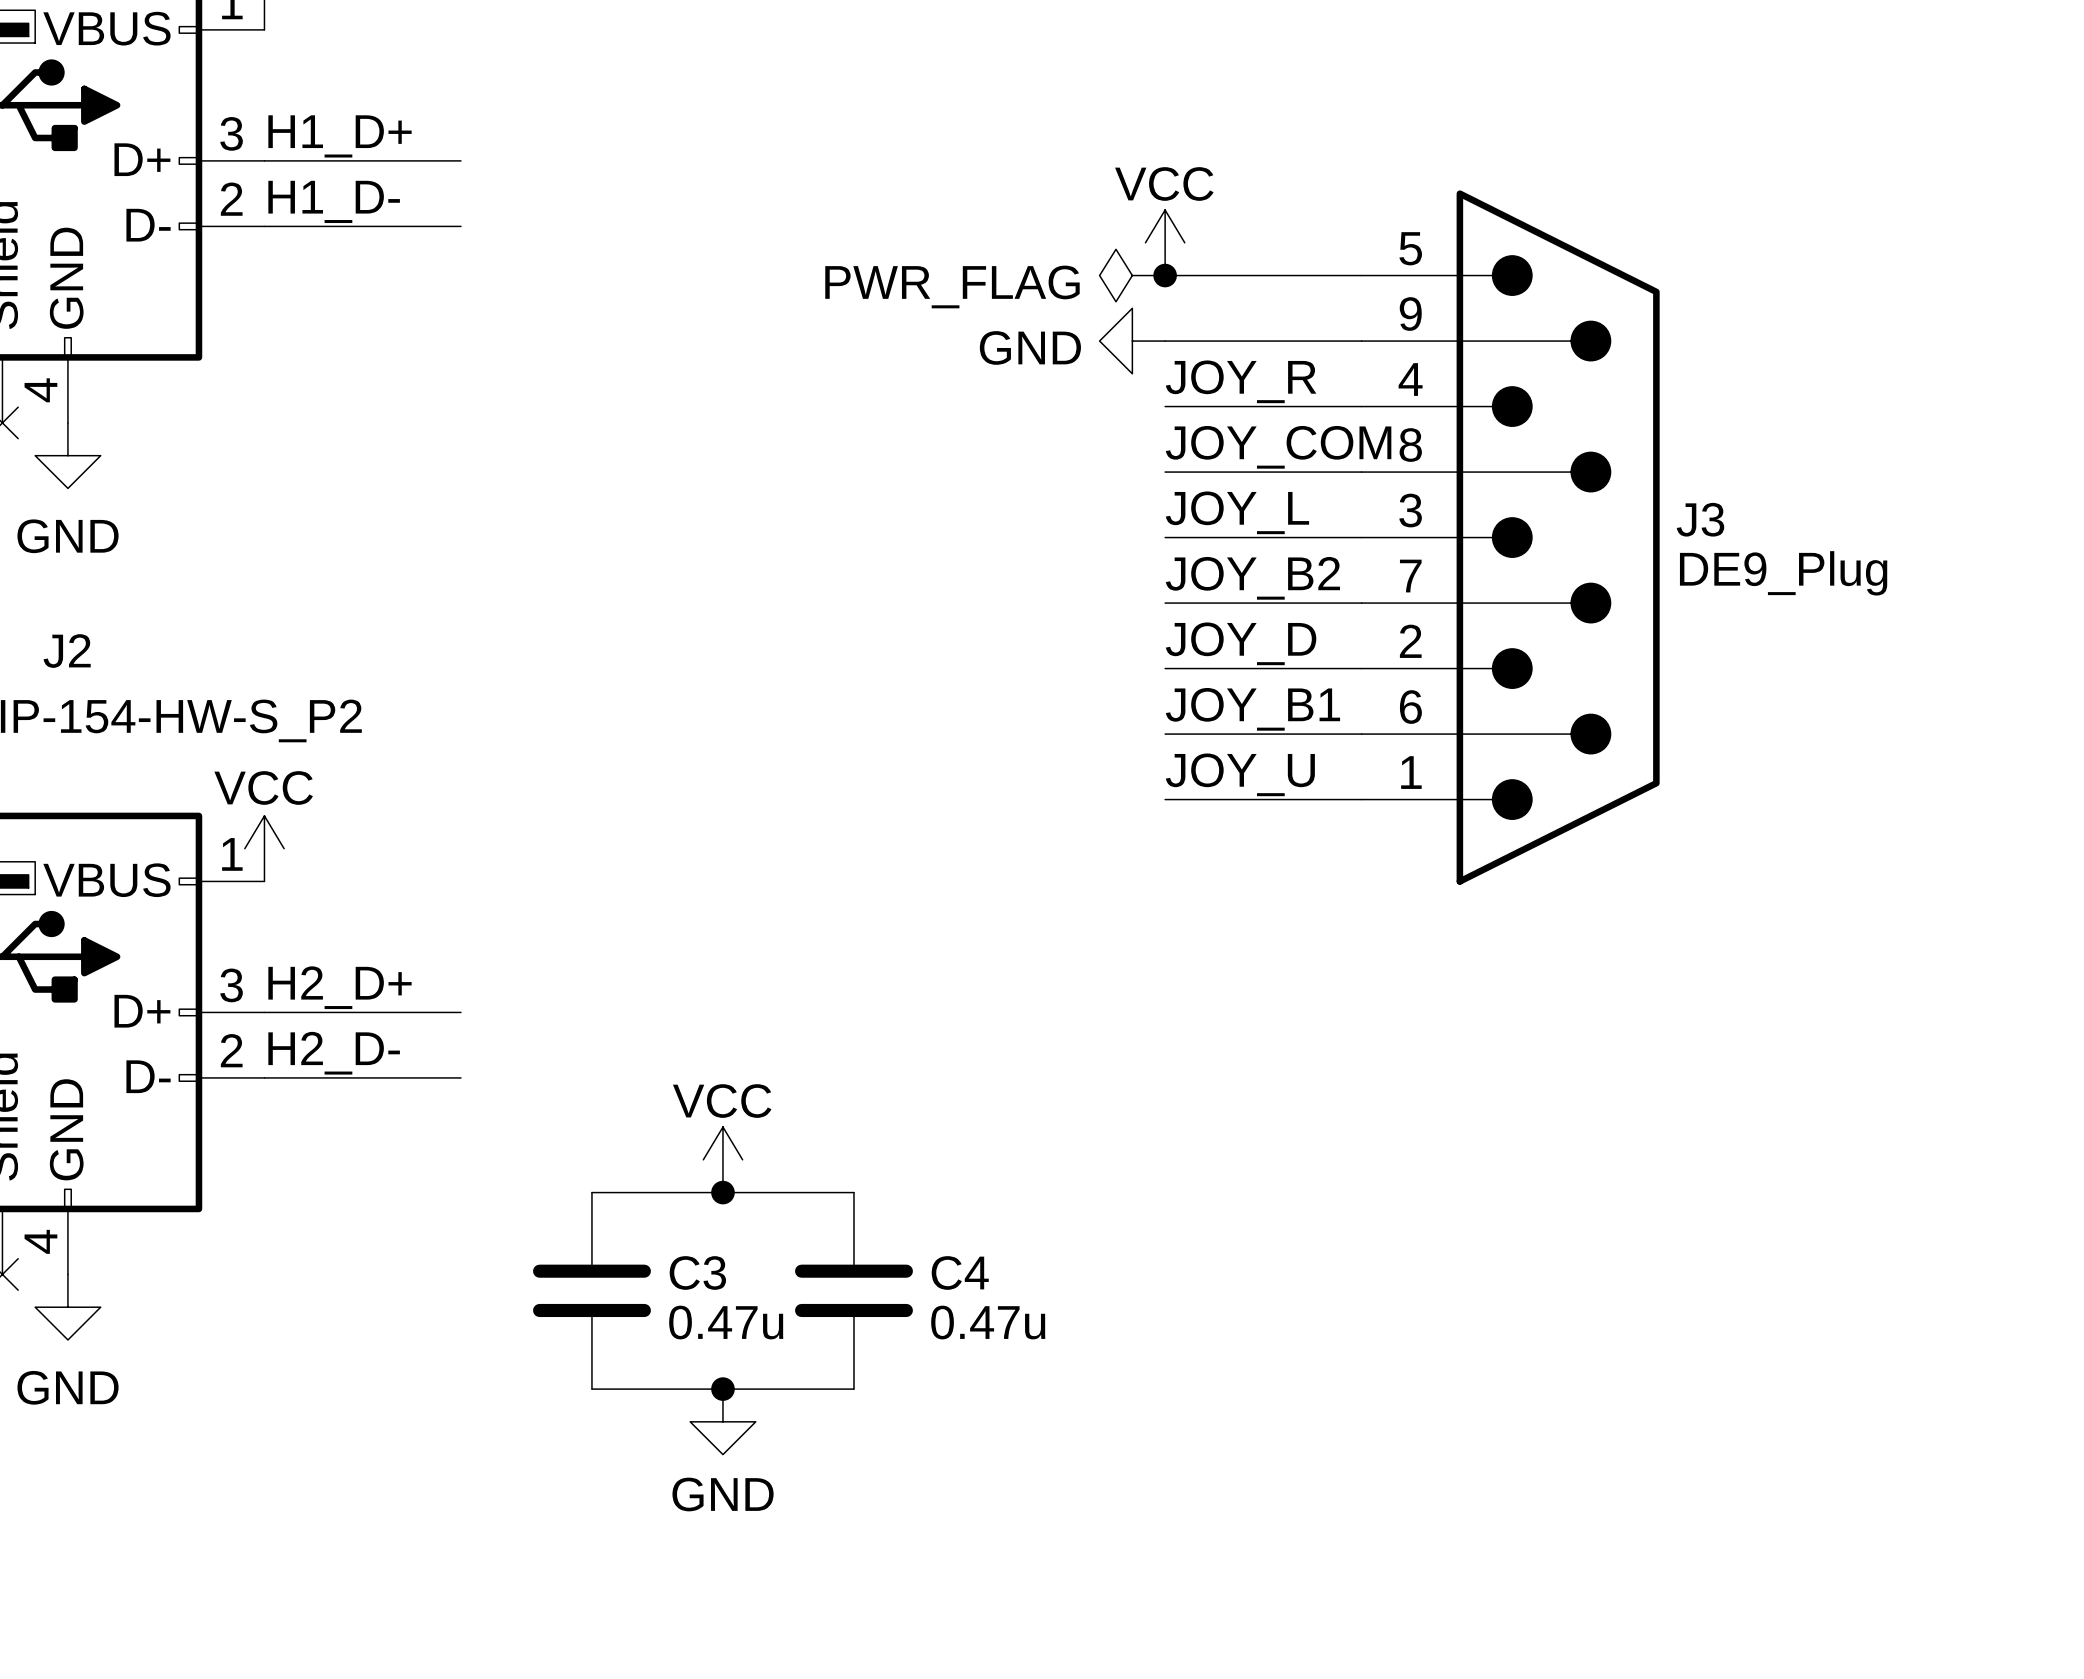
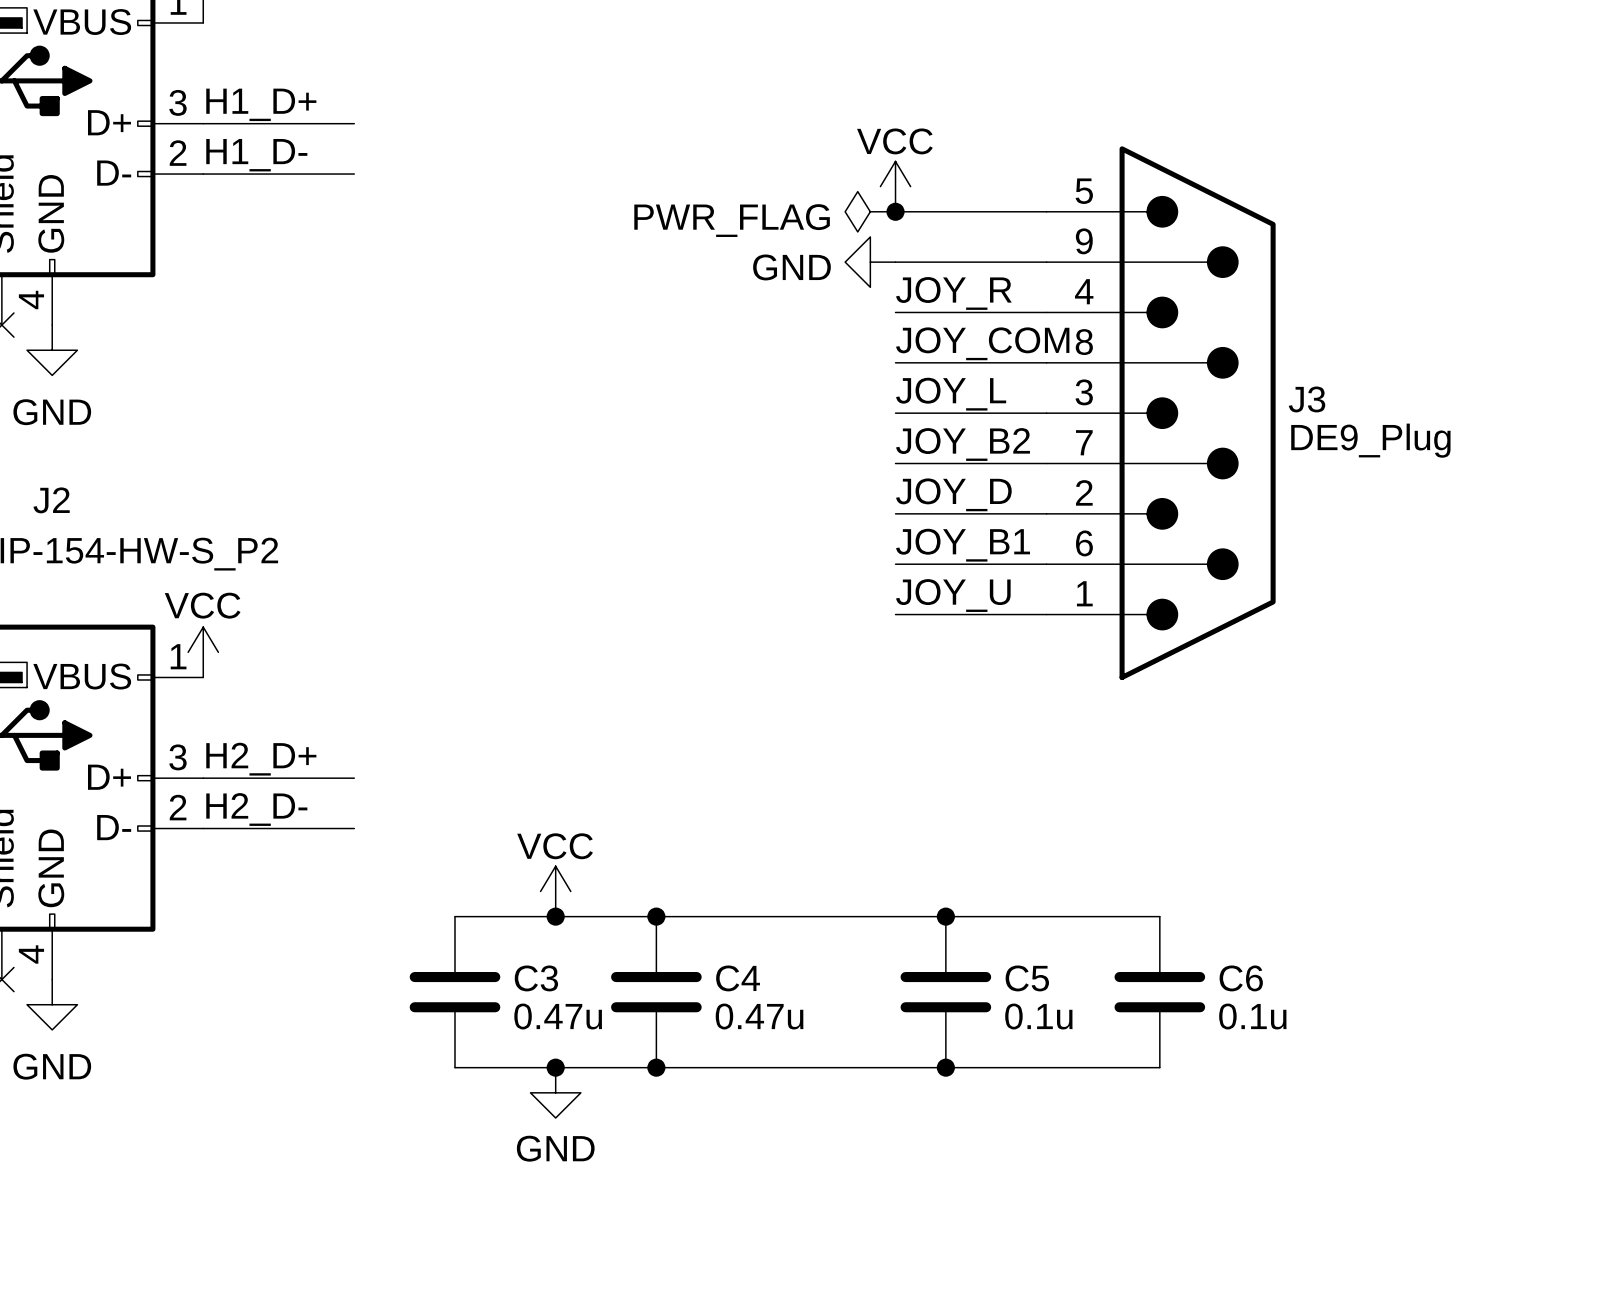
wire: none -> (656, 916) (1159, 916)
junction: none -> (656, 916)
junction: none -> (945, 916)
C5: none -> 0.1u (945, 992)
C6: none -> 0.1u (1159, 992)
wire: none -> (656, 1067) (1159, 1067)
junction: none -> (656, 1067)
junction: none -> (945, 1067)

